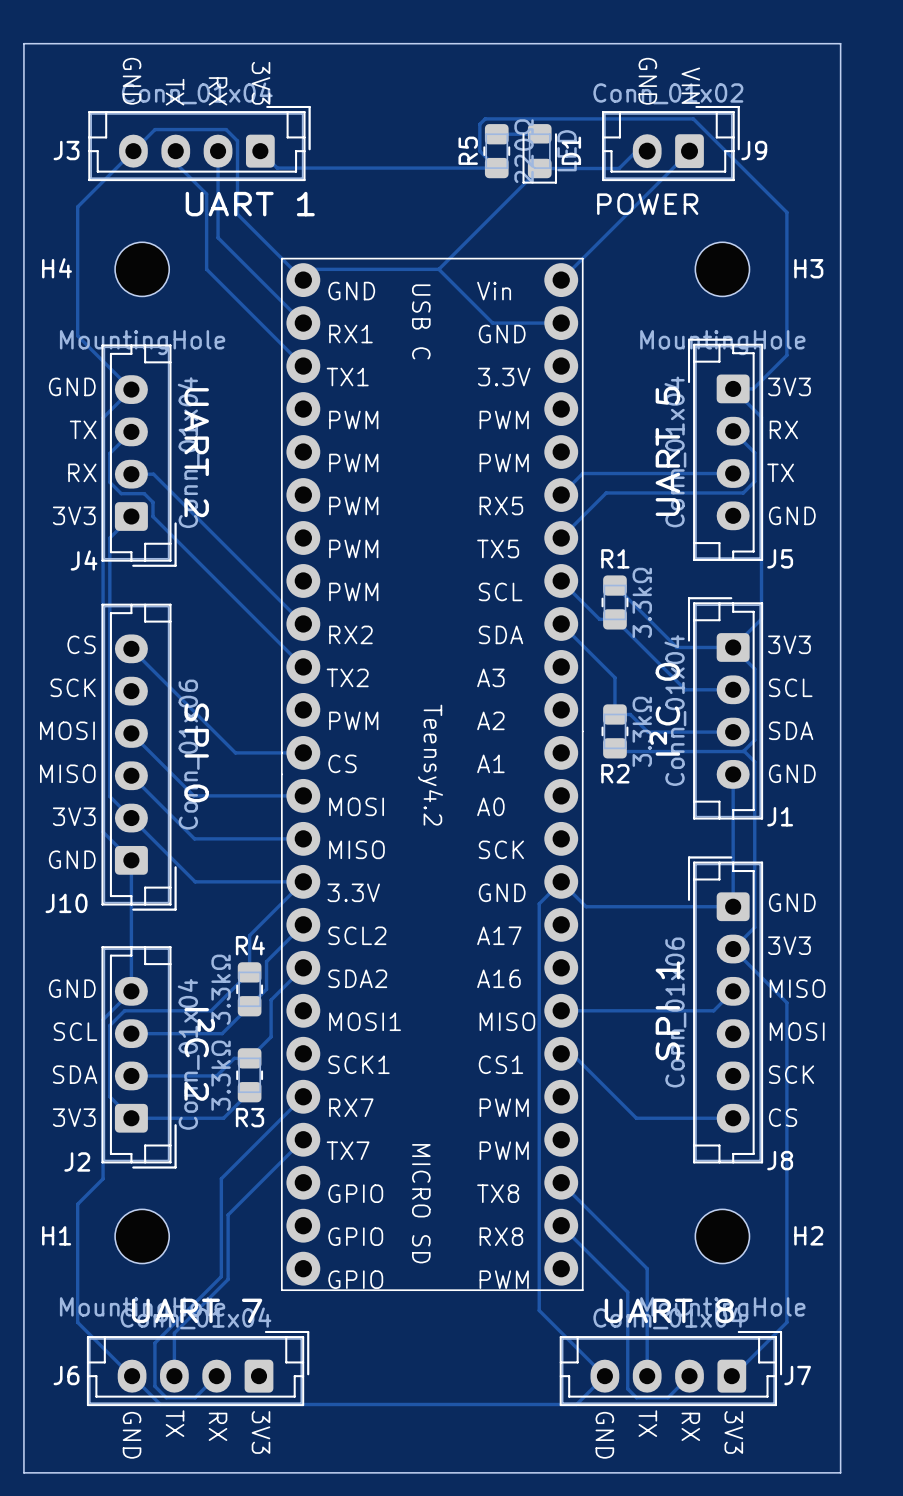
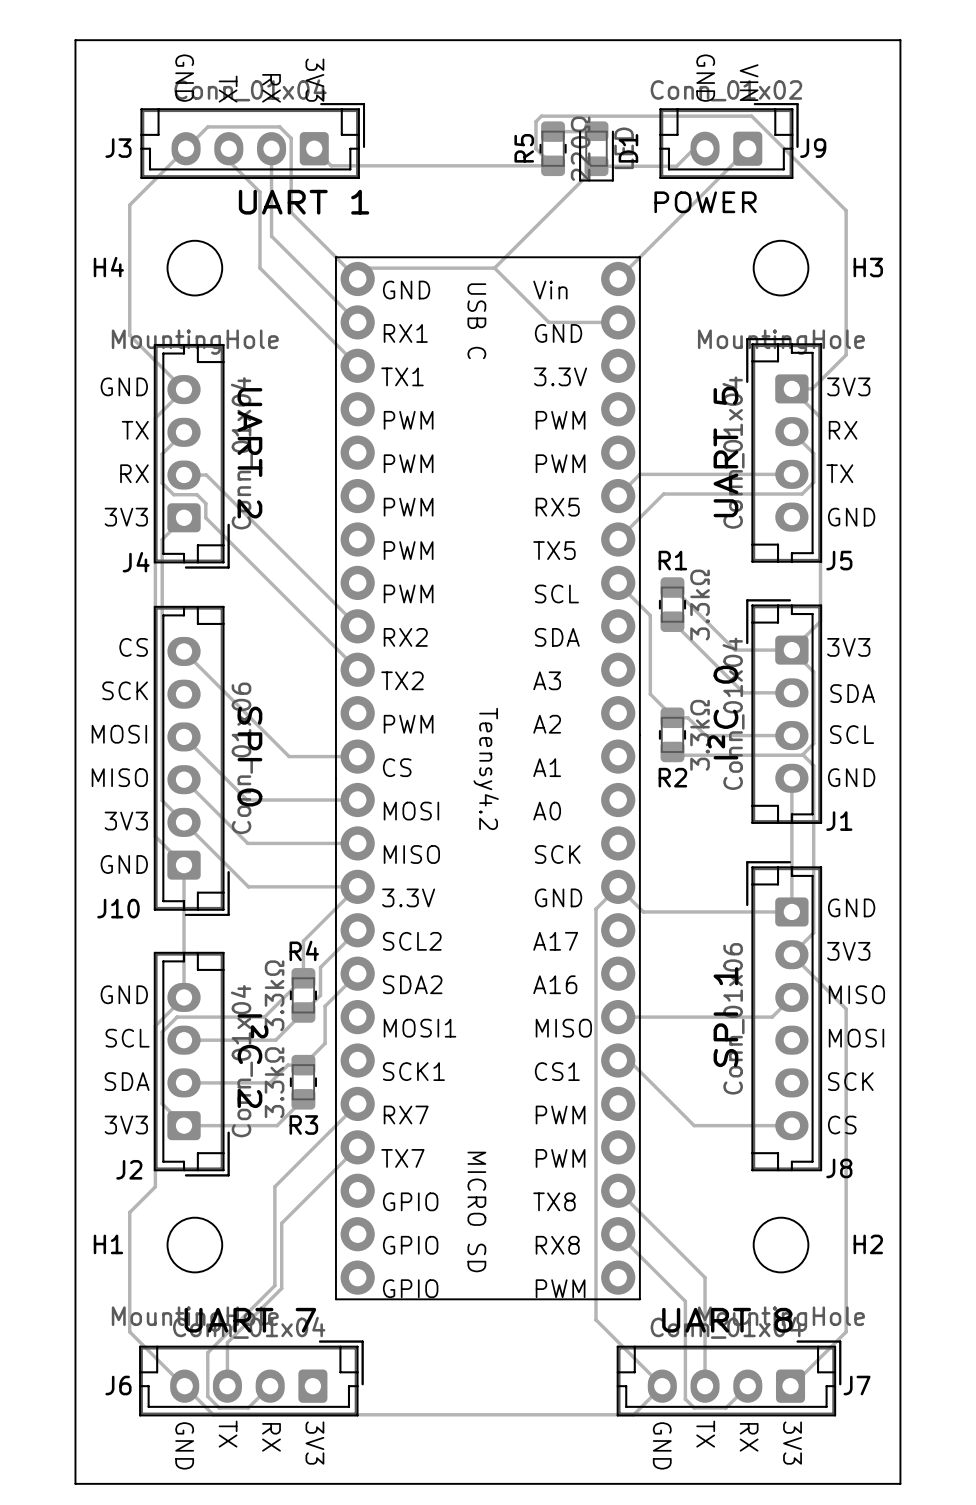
track: (561, 580) (599, 619) (614, 619) -> none
track: (561, 623) (614, 677) (614, 713) -> (618, 582) (650, 615) (650, 694) (672, 716)
text: SCL (790, 687) -> SDA (852, 693)
text: SDA (791, 730) -> SCL (852, 734)

